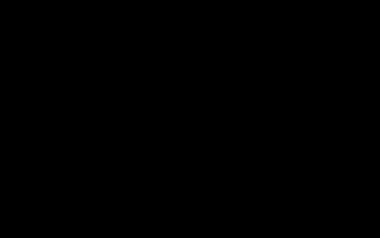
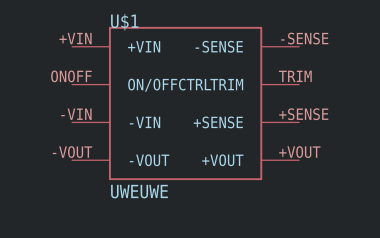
U$1: none -> UWEUWE (185, 103)

